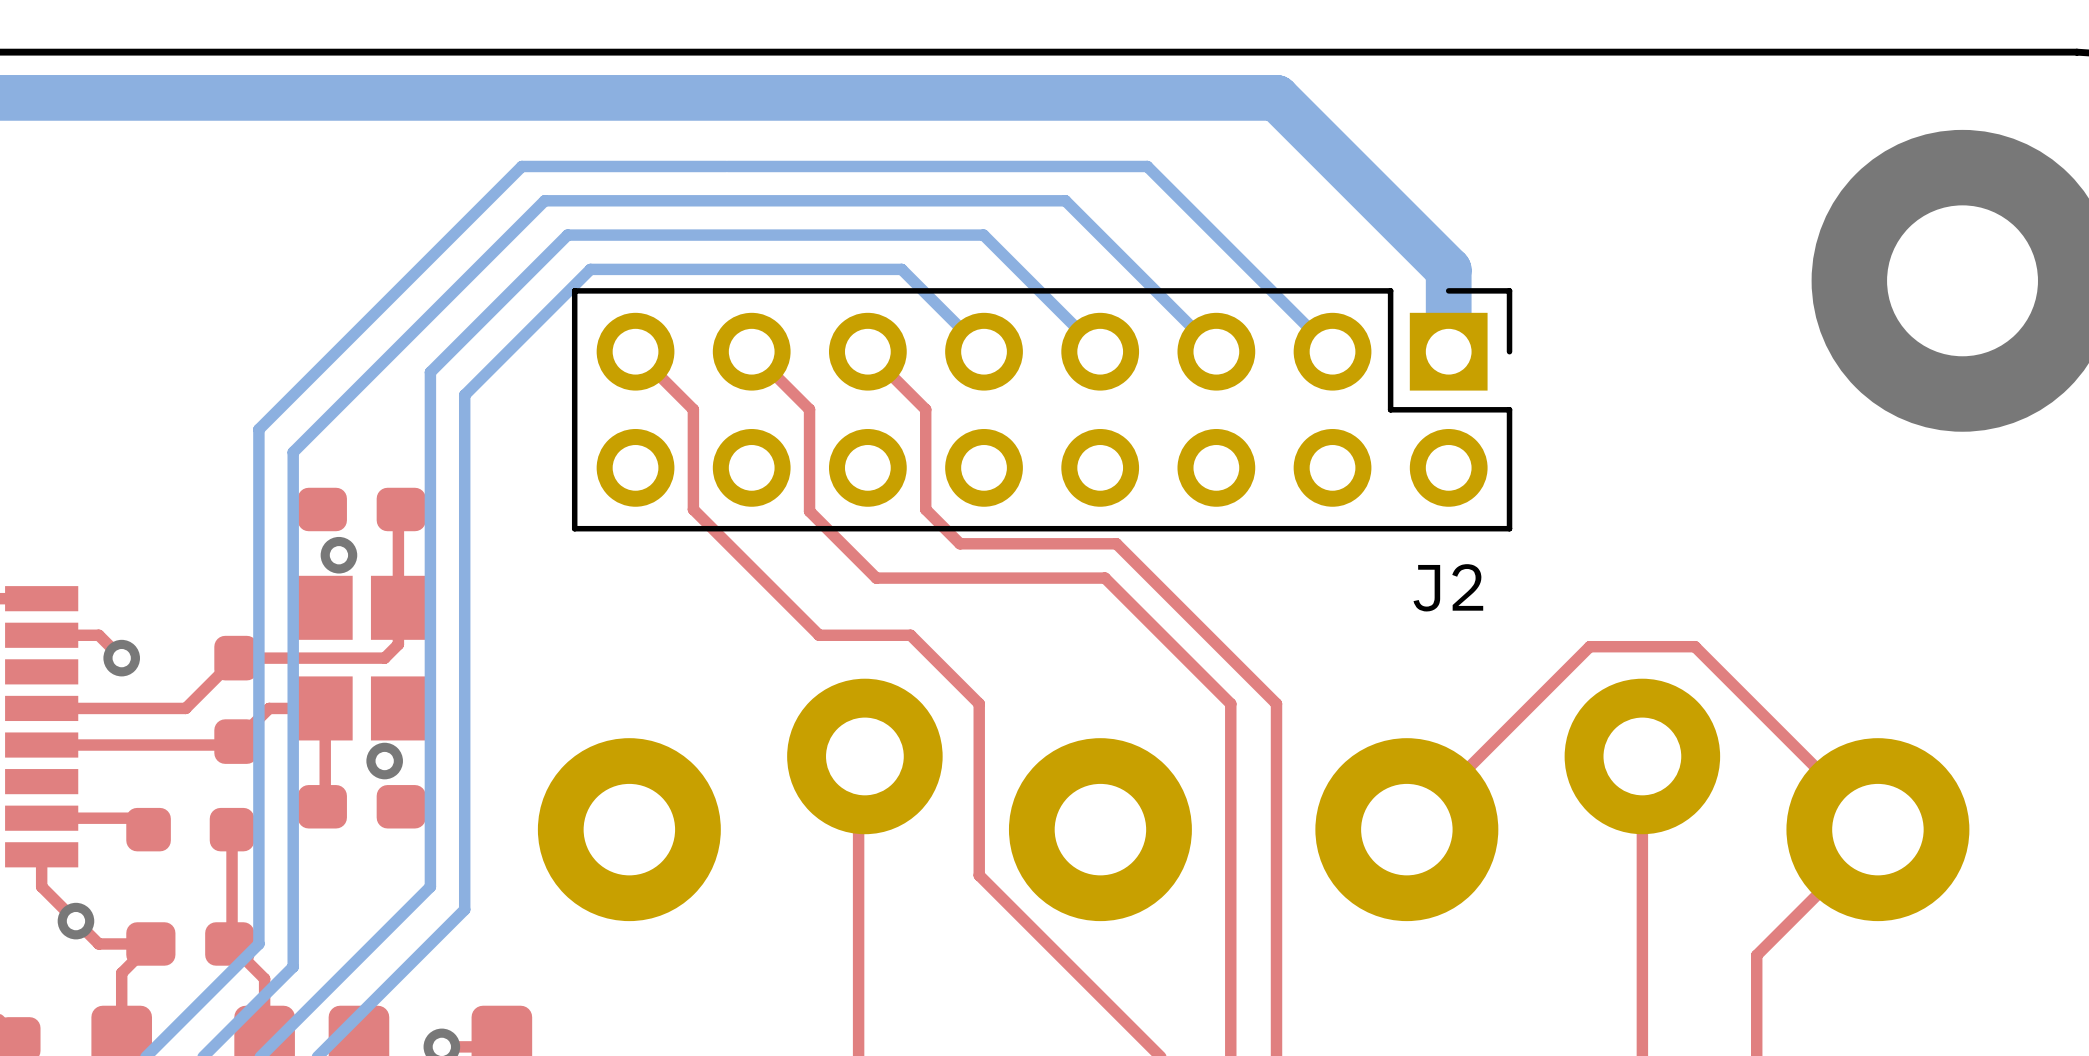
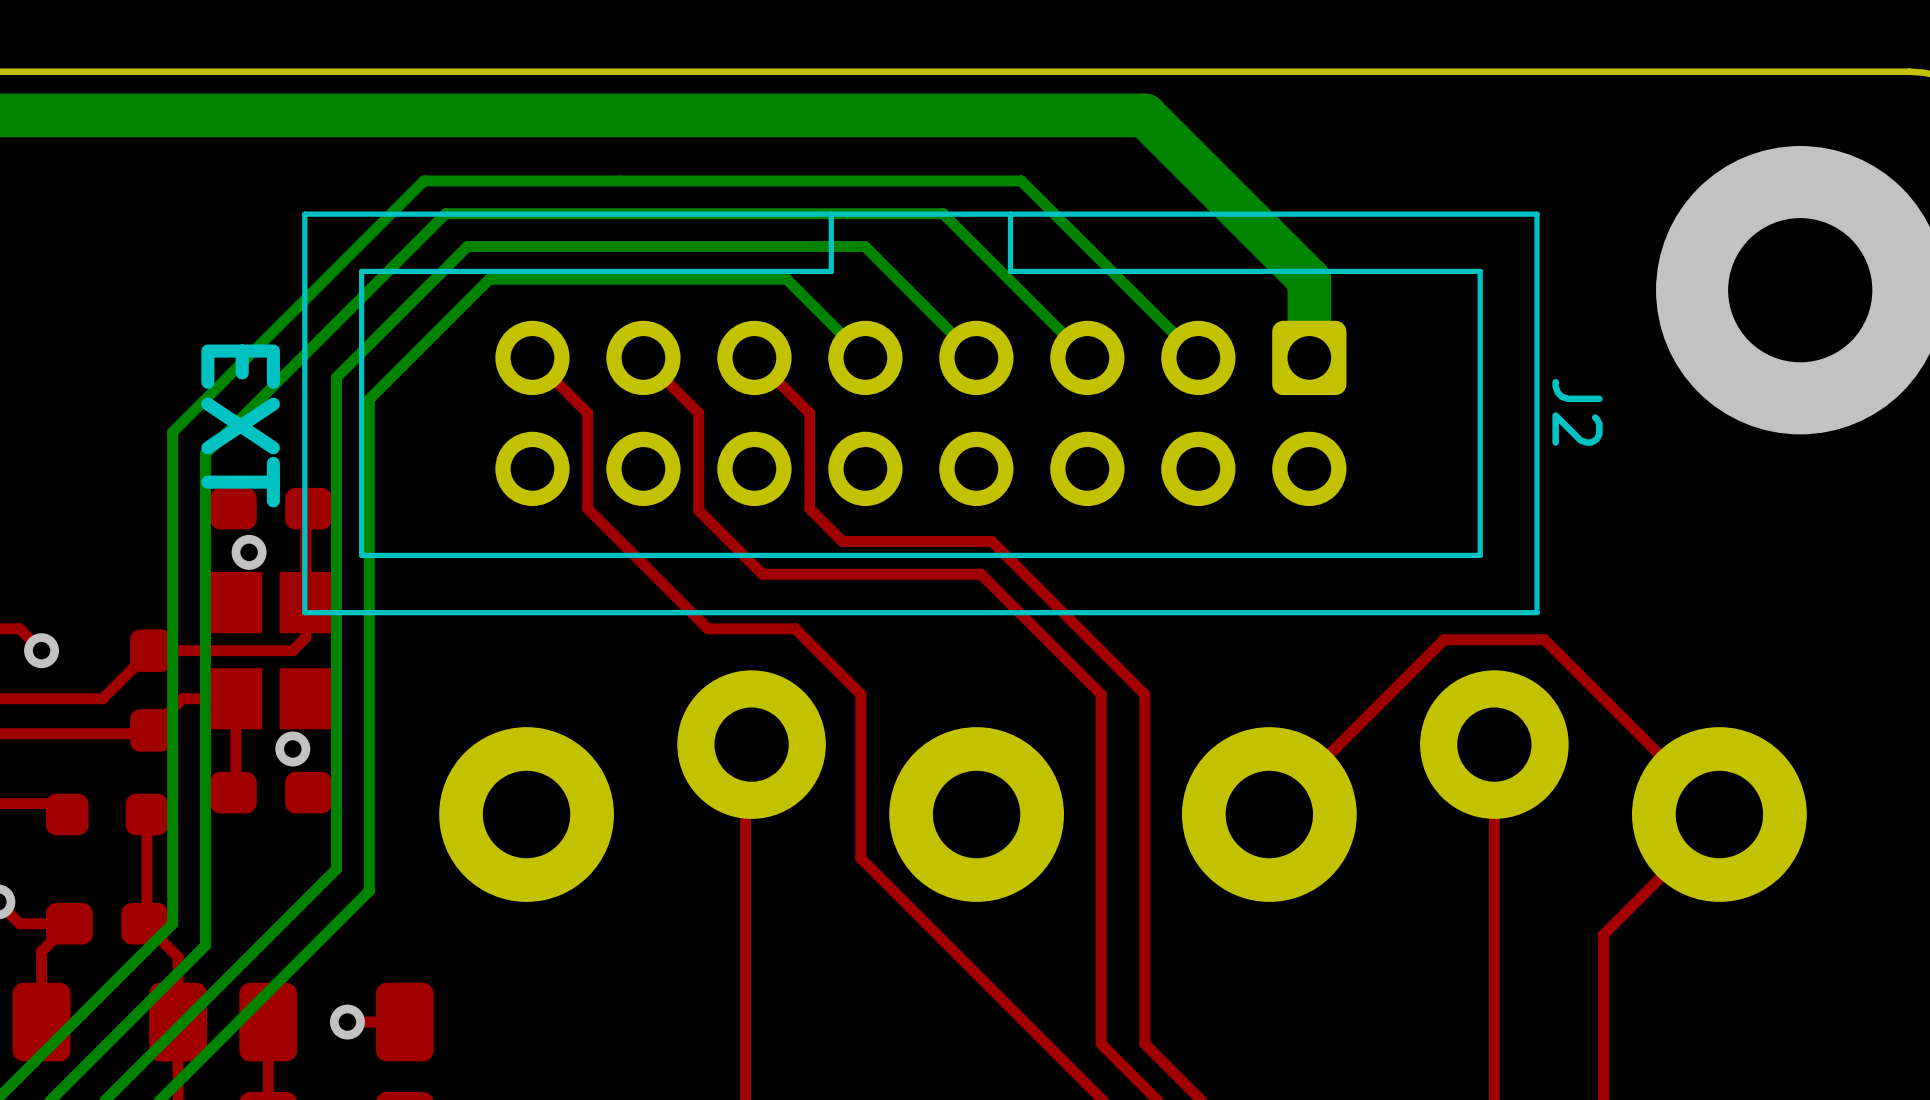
J2 footprint: [571, 288, 1513, 532] -> [302, 211, 1540, 616]
text: none -> EXT (240, 425)
J2 name position: J2 (1448, 587) -> J2 (1577, 412)

